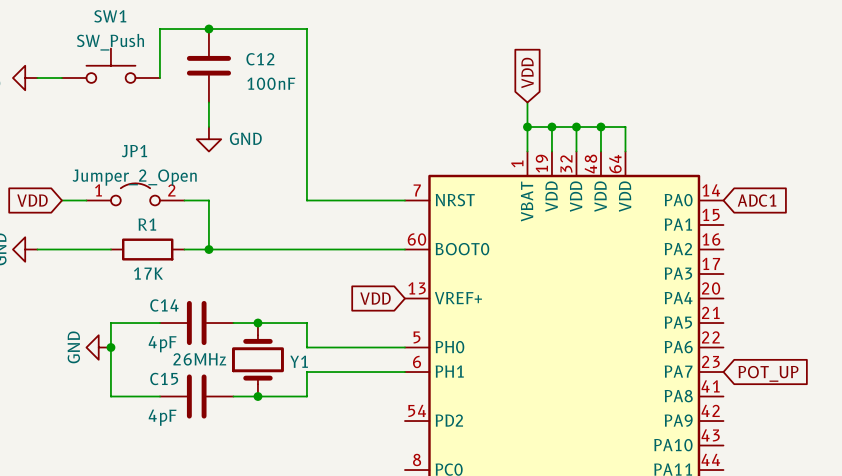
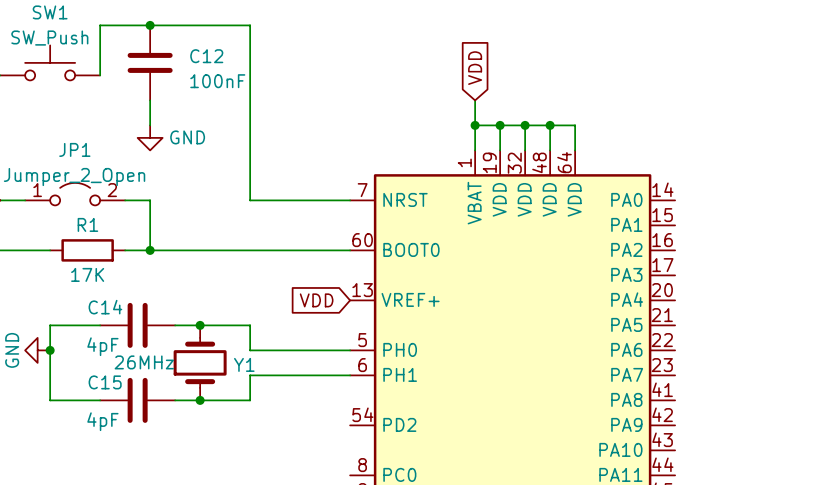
global label: ADC1 (757, 200) -> none
global label: POT_UP (768, 373) -> none

